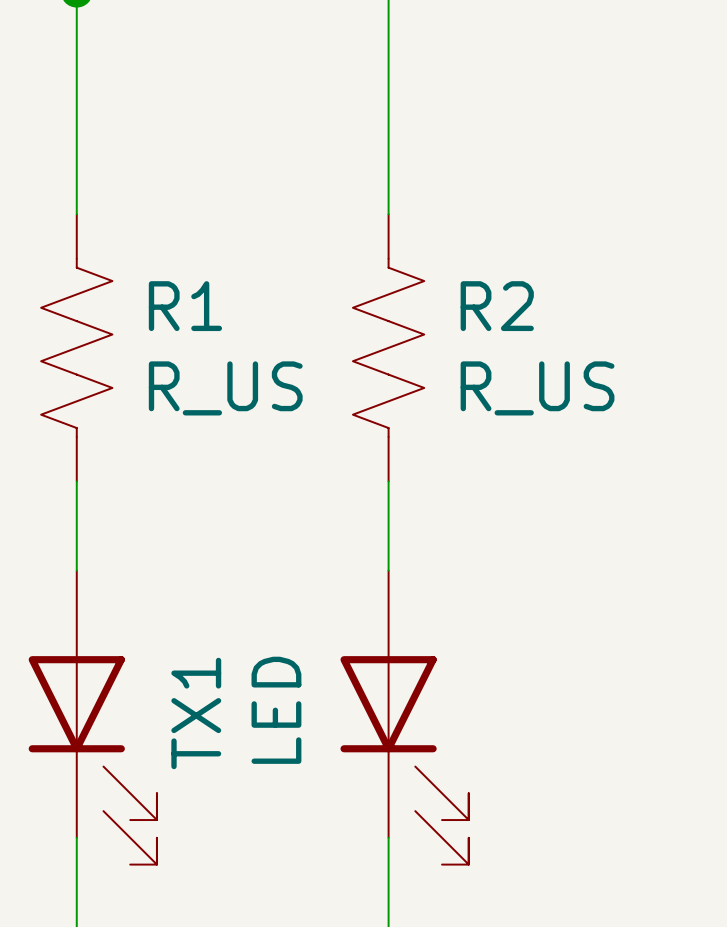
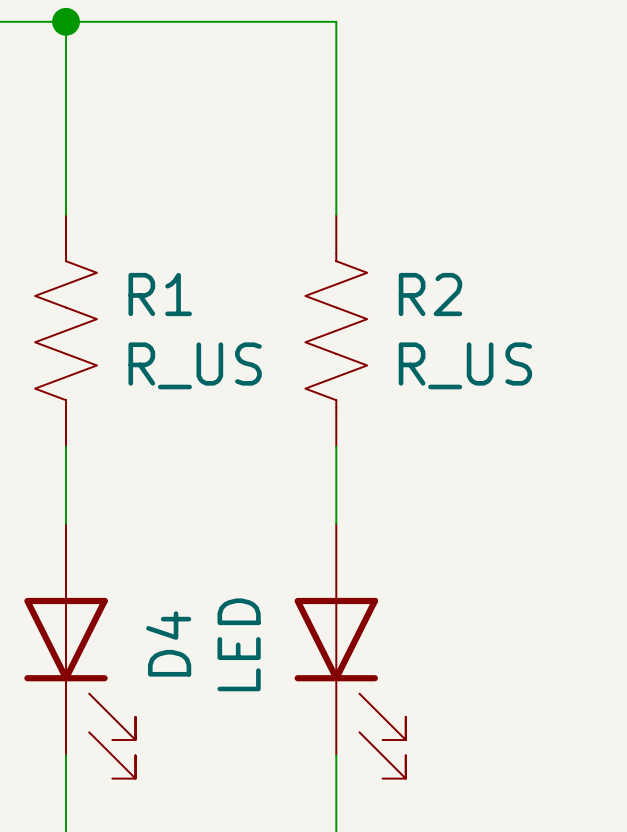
TX1 name: TX1 (196, 713) -> D4 (168, 643)

